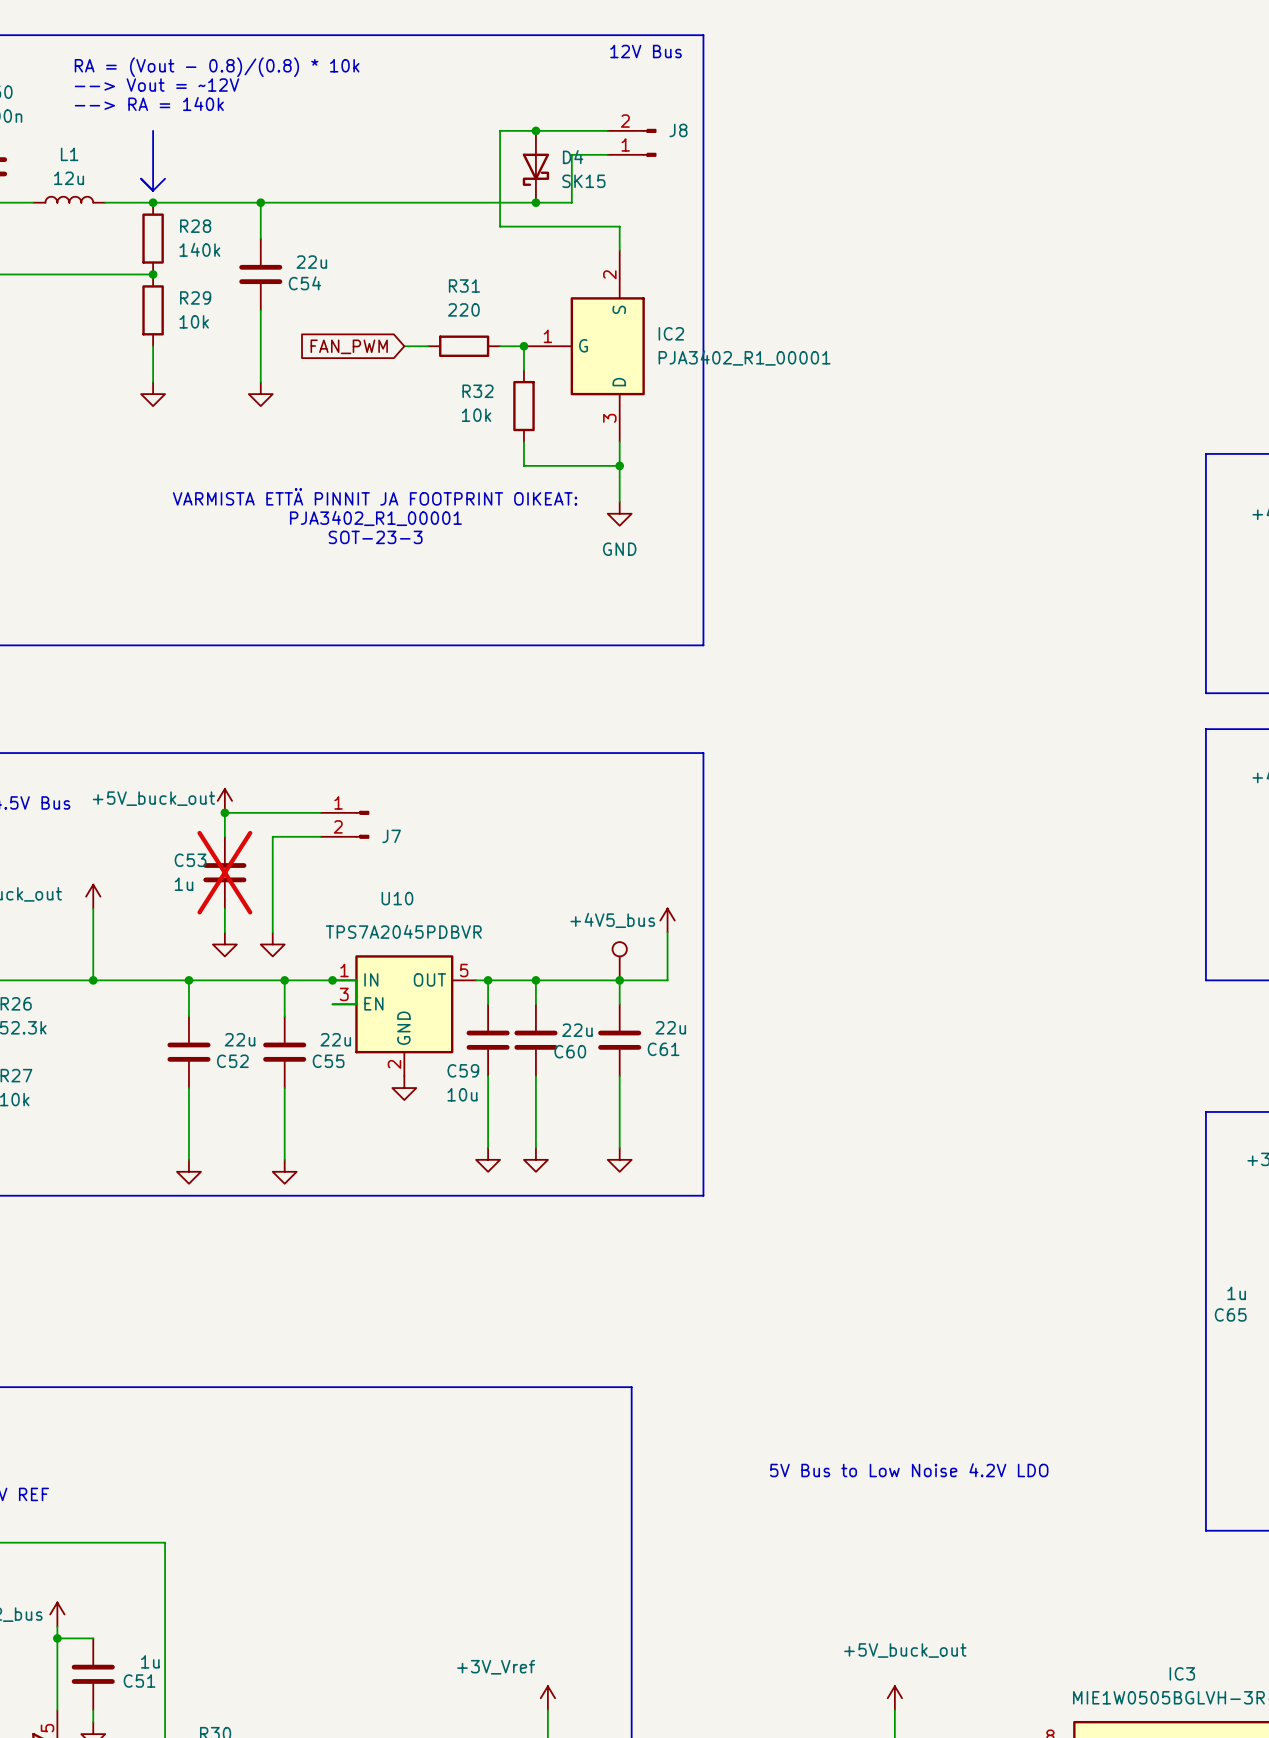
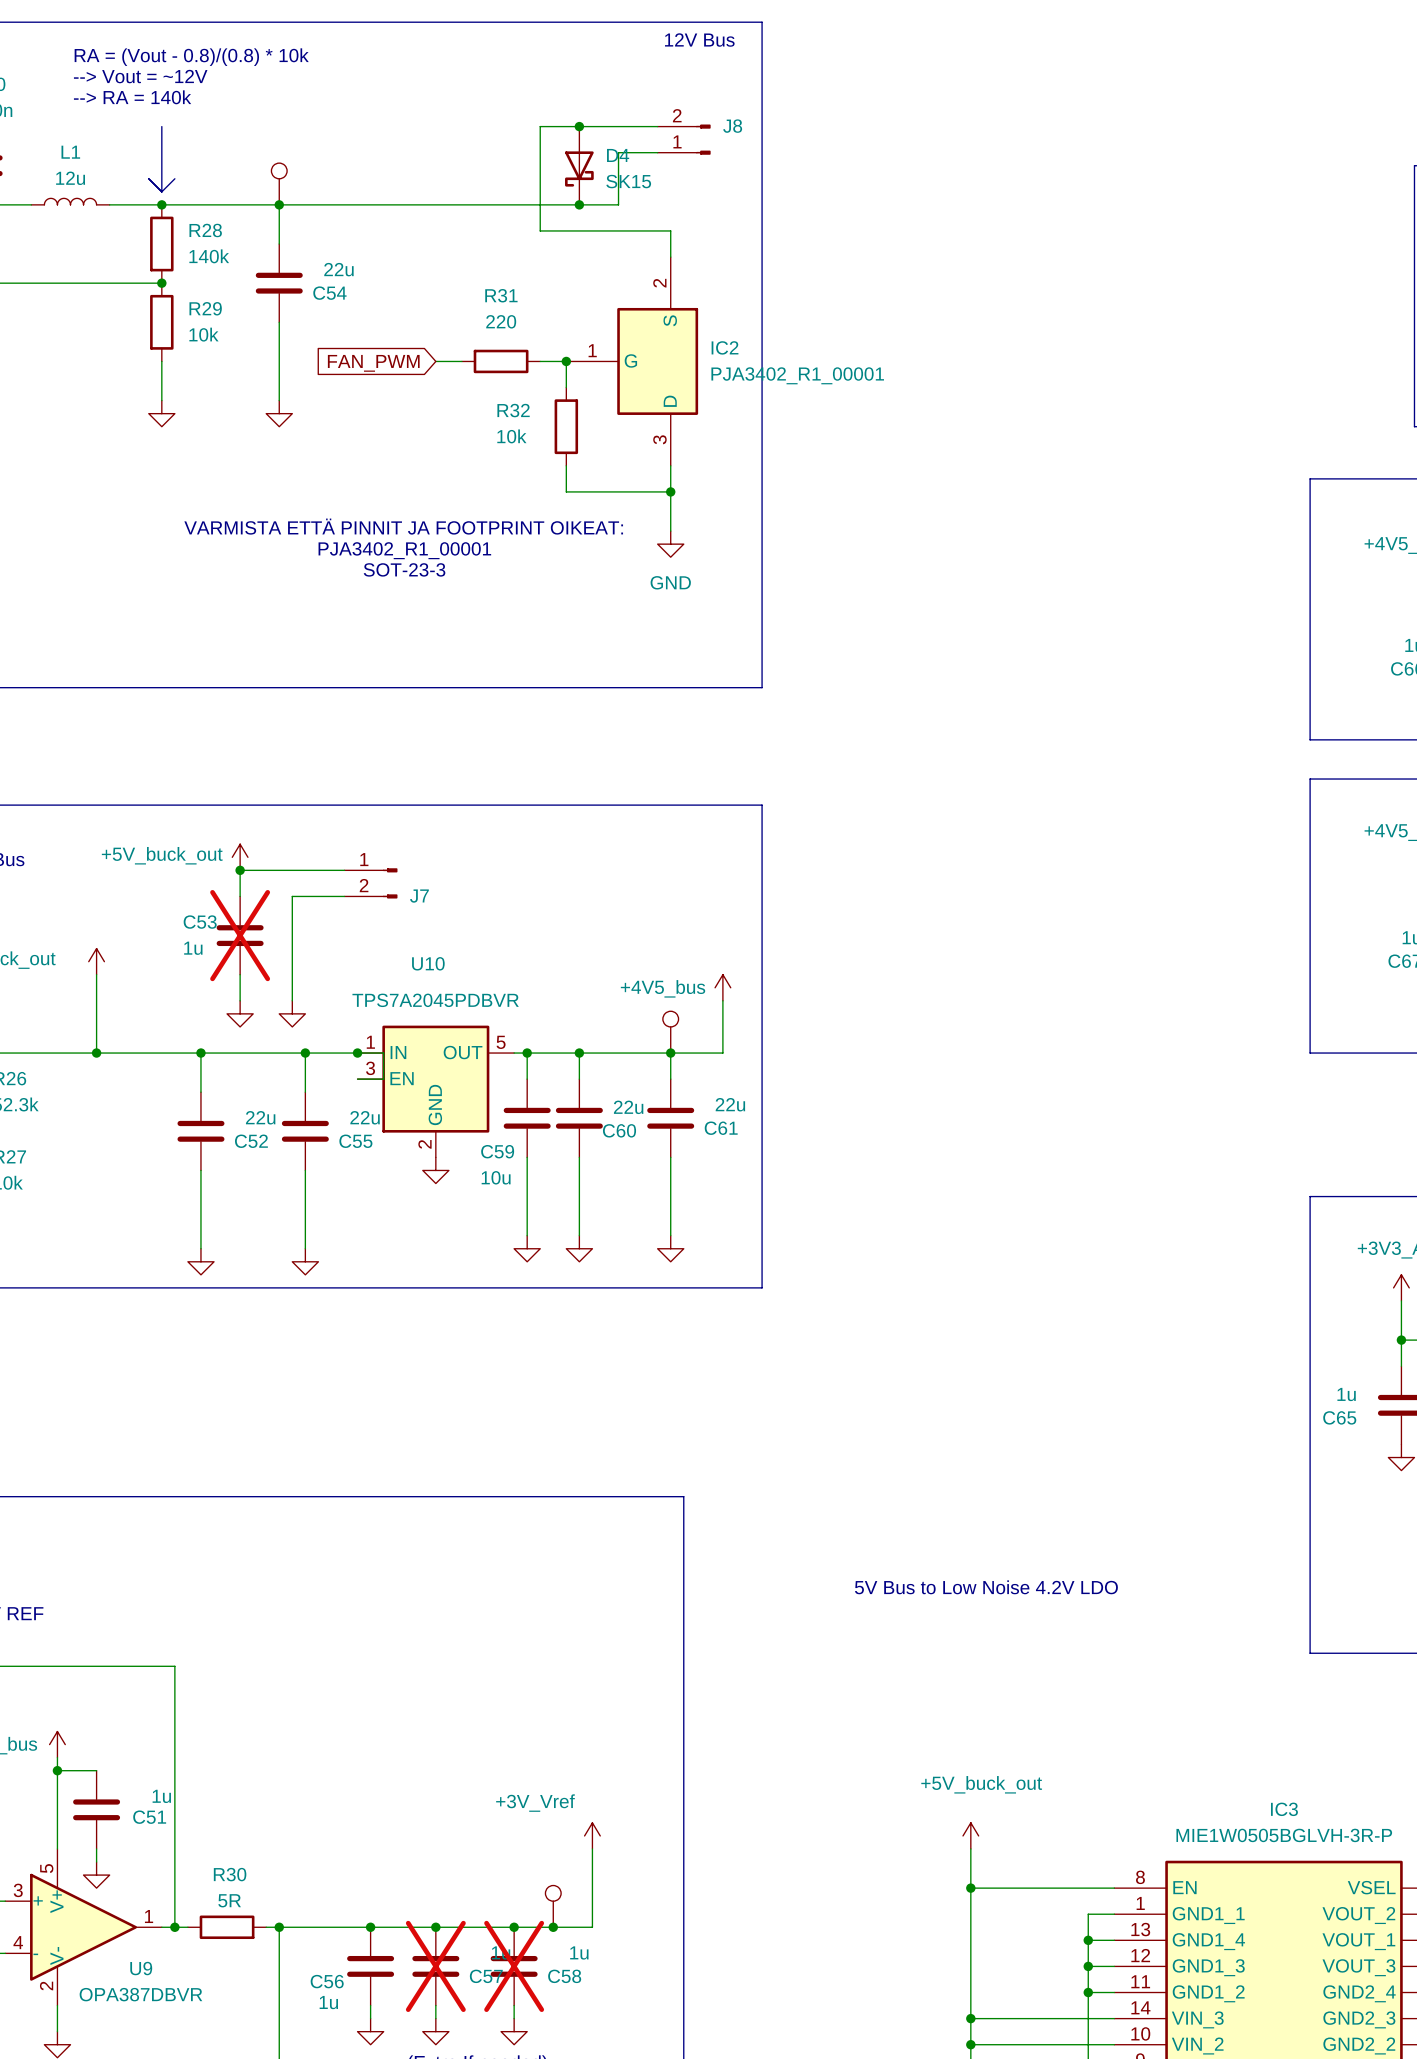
part: none -> (279, 184)

